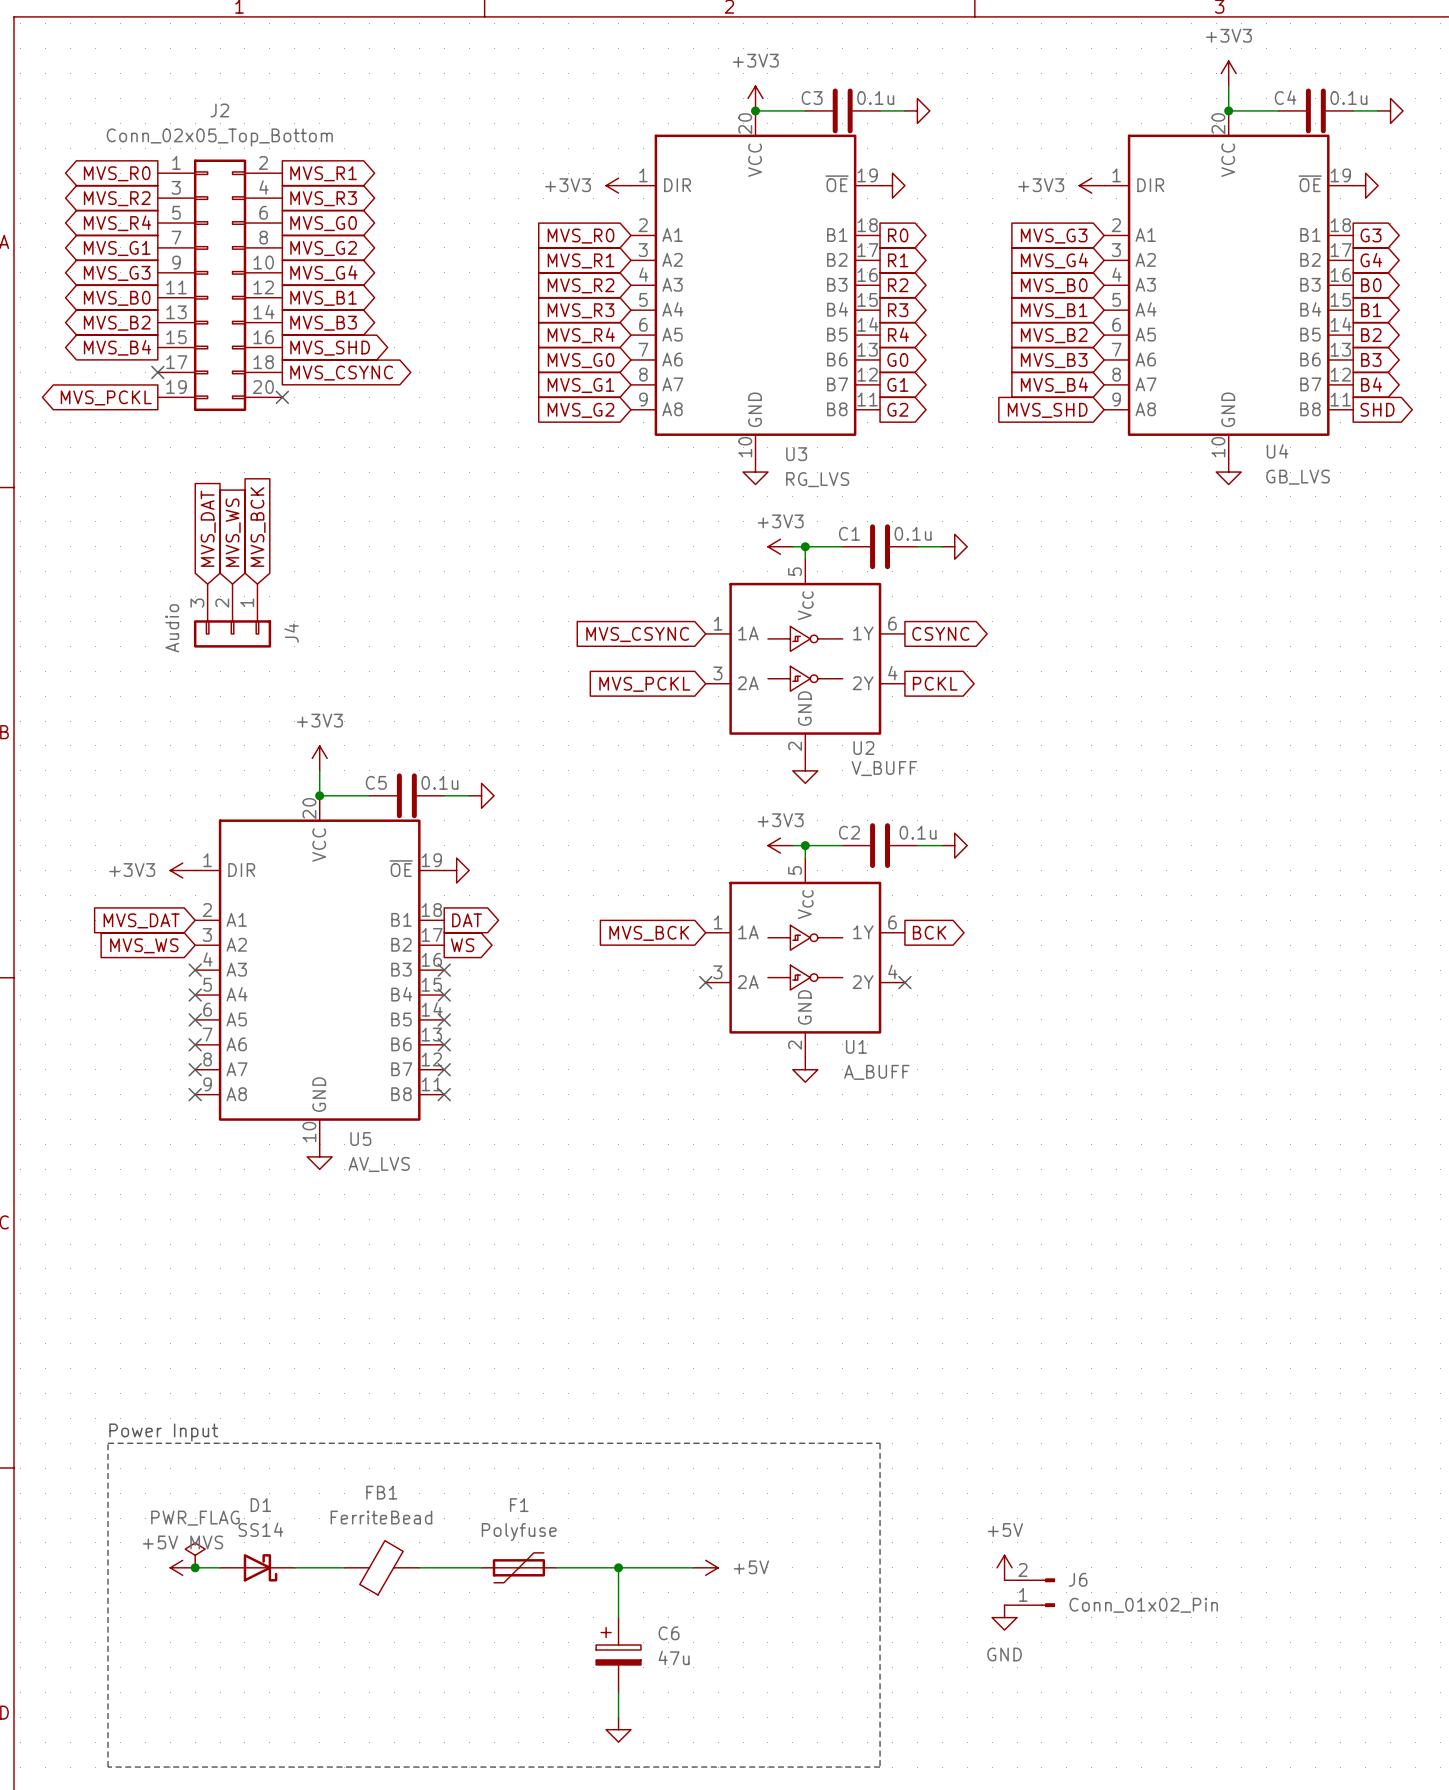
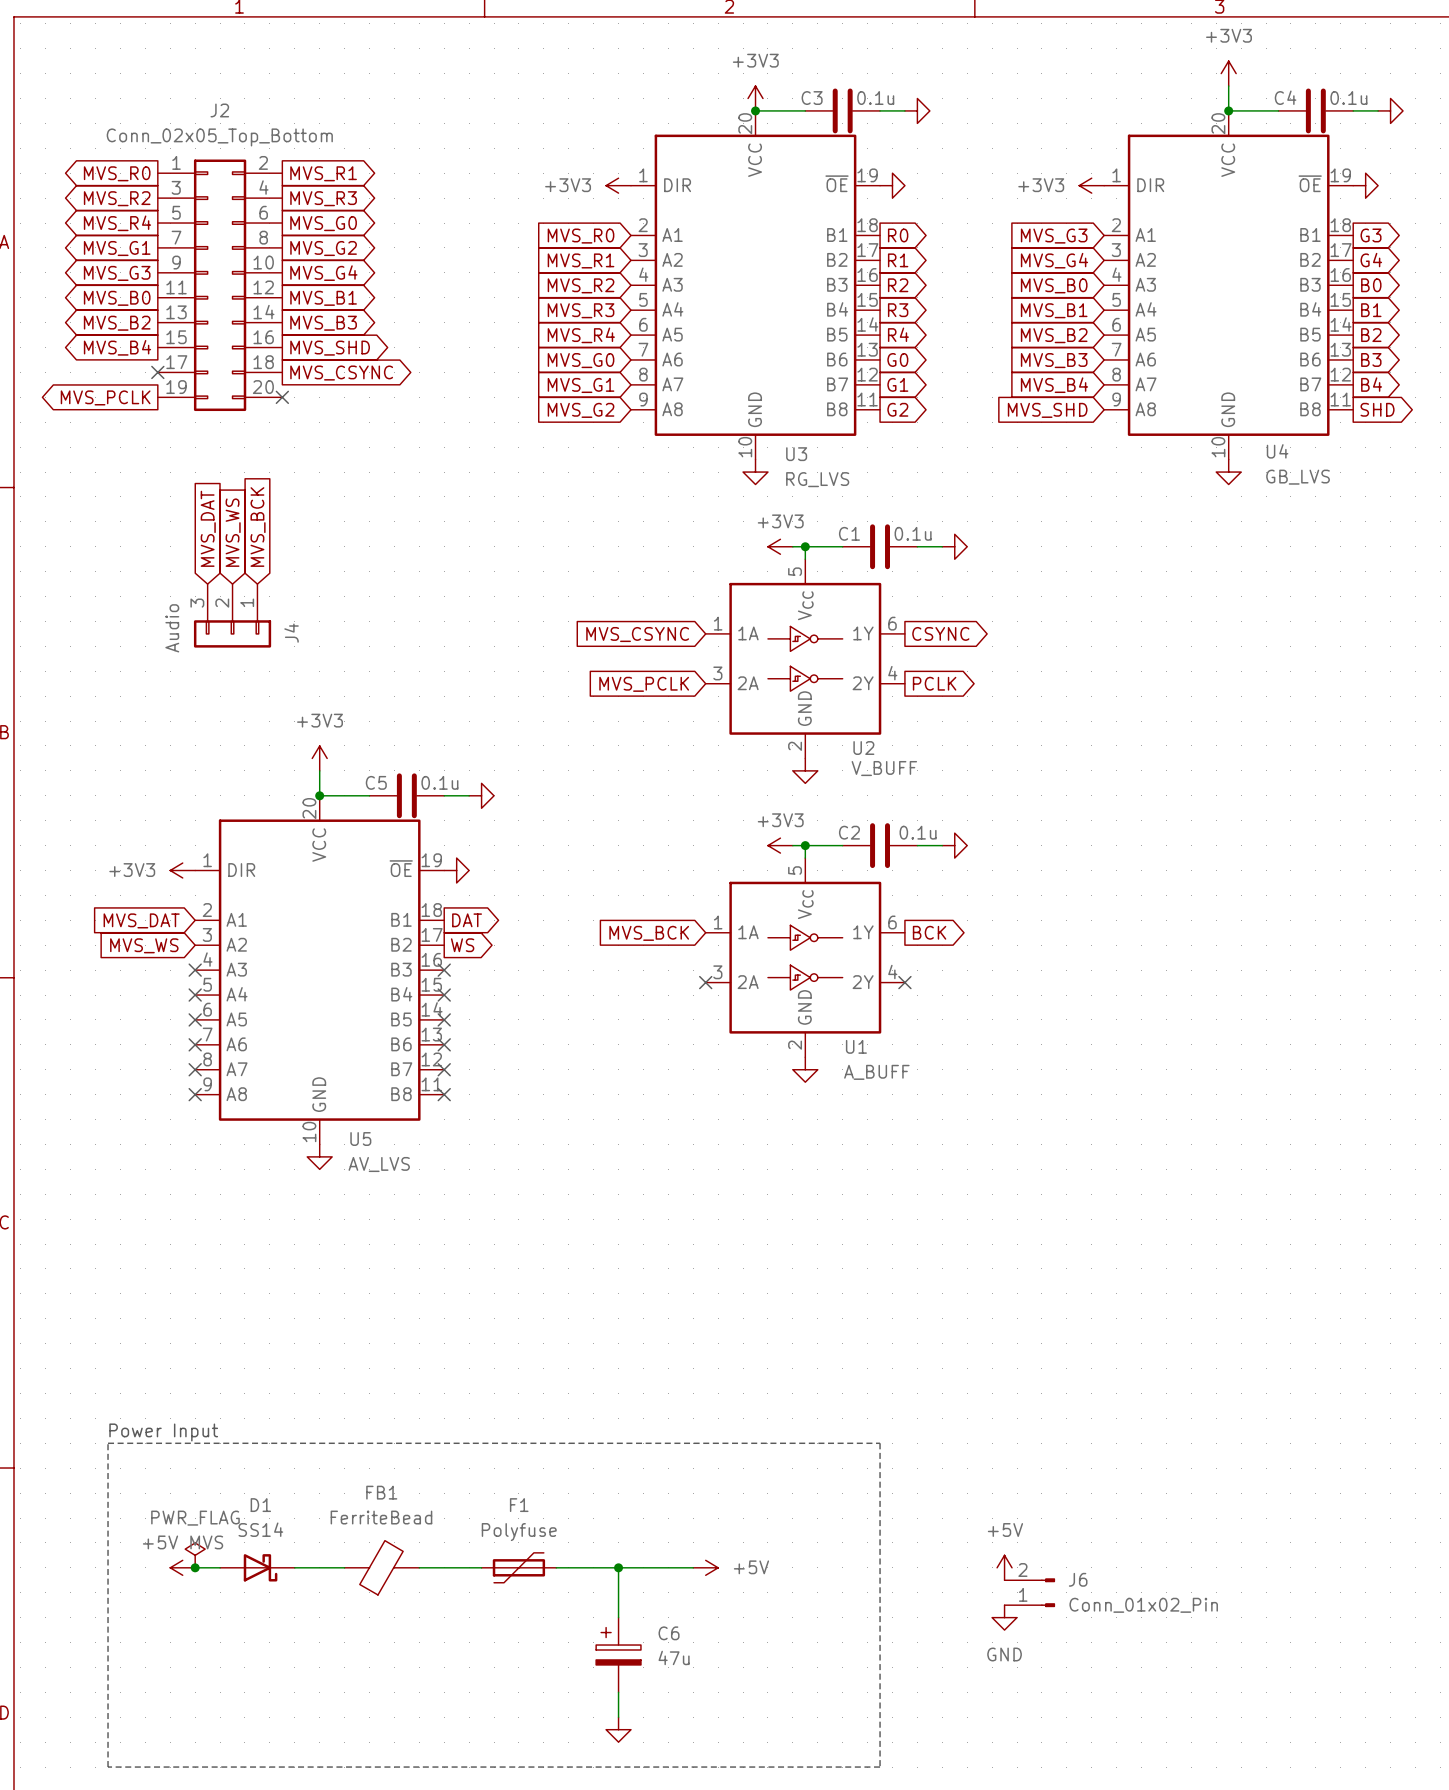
global label: MVS_PCKL (106, 397) -> MVS_PCLK (105, 397)
global label: PCKL (935, 683) -> PCLK (934, 683)
global label: MVS_PCKL (644, 684) -> MVS_PCLK (644, 684)

